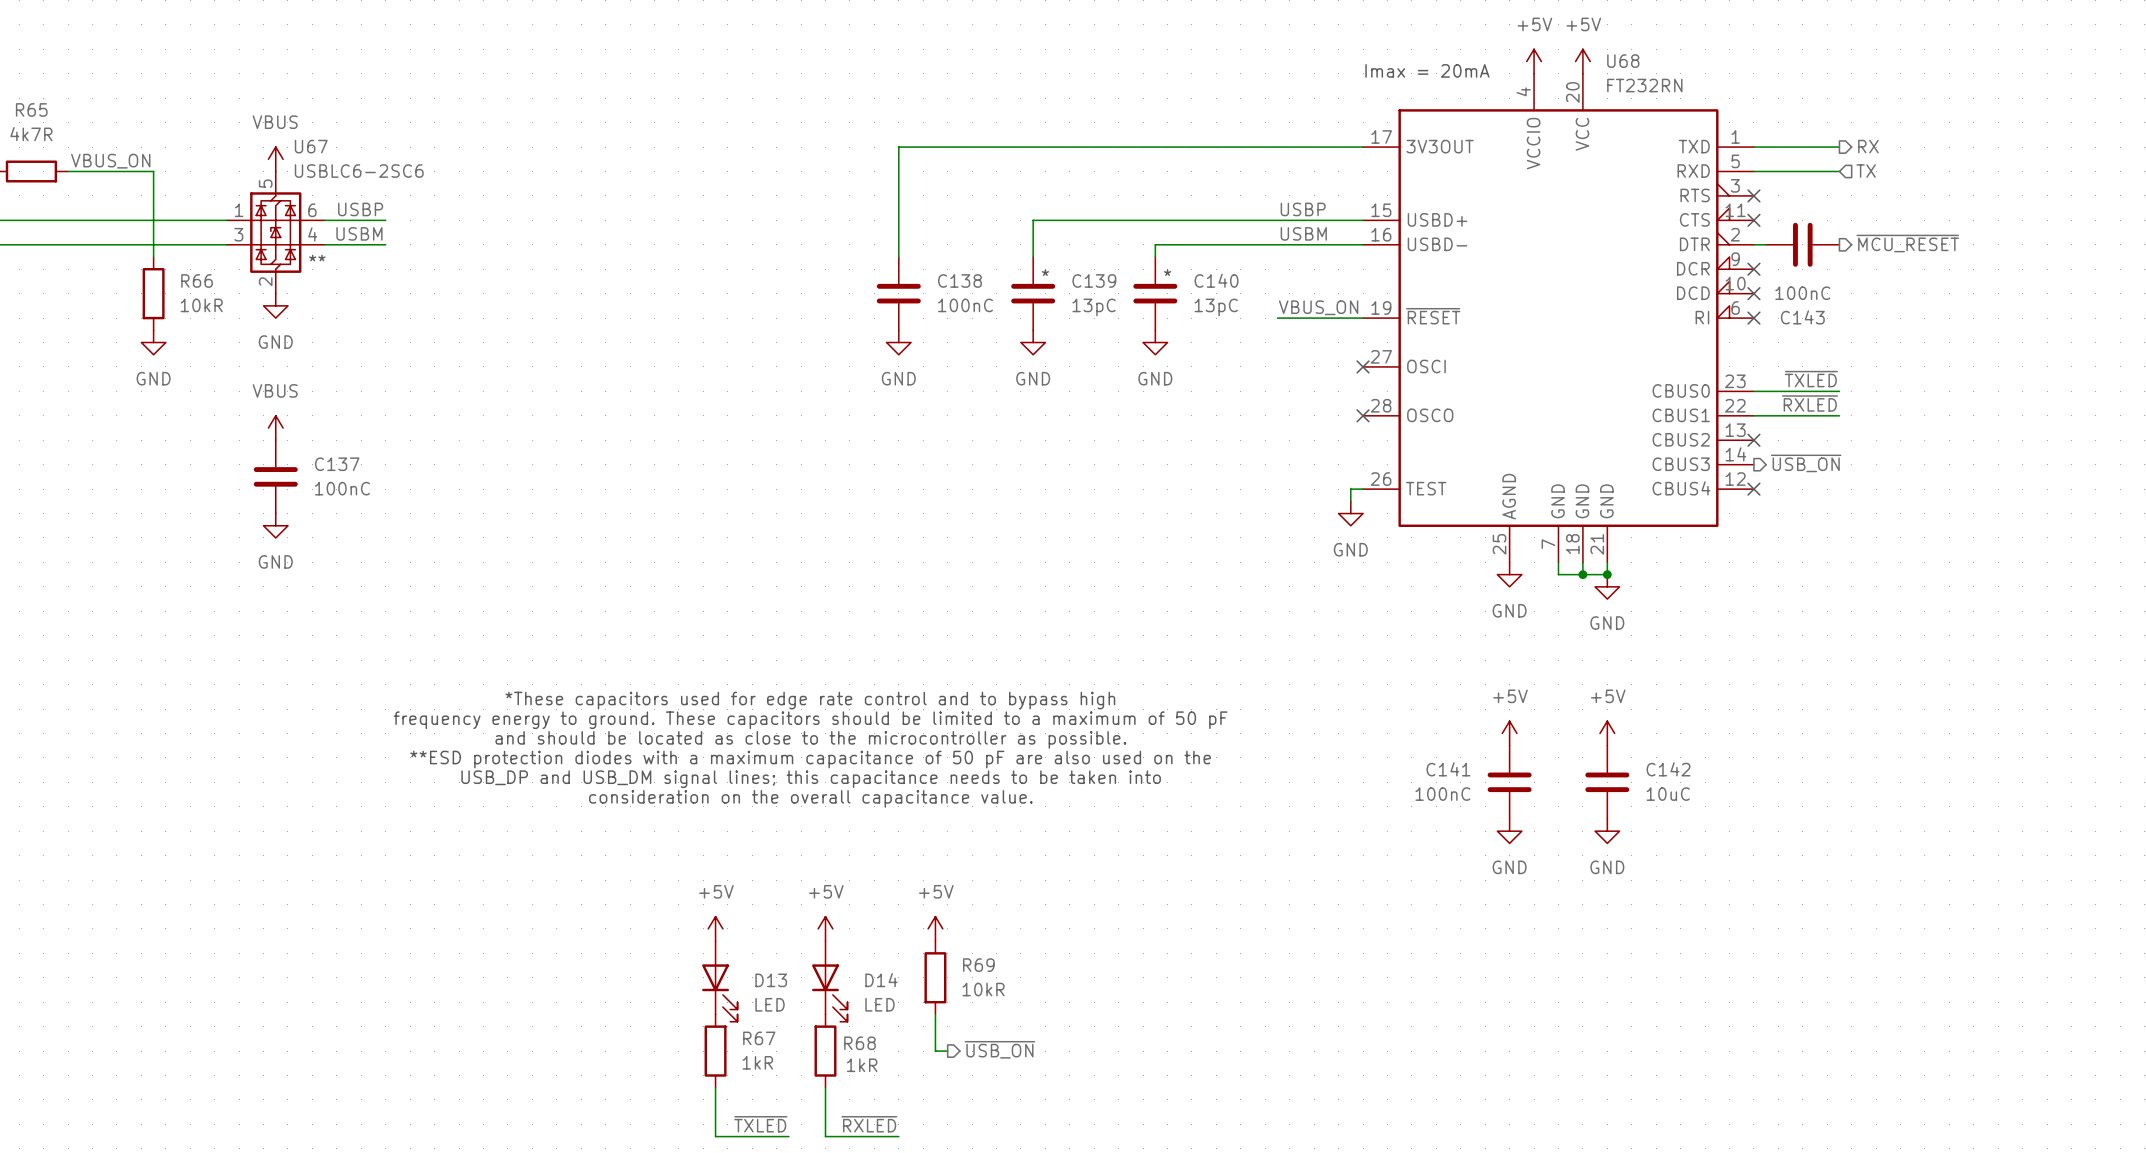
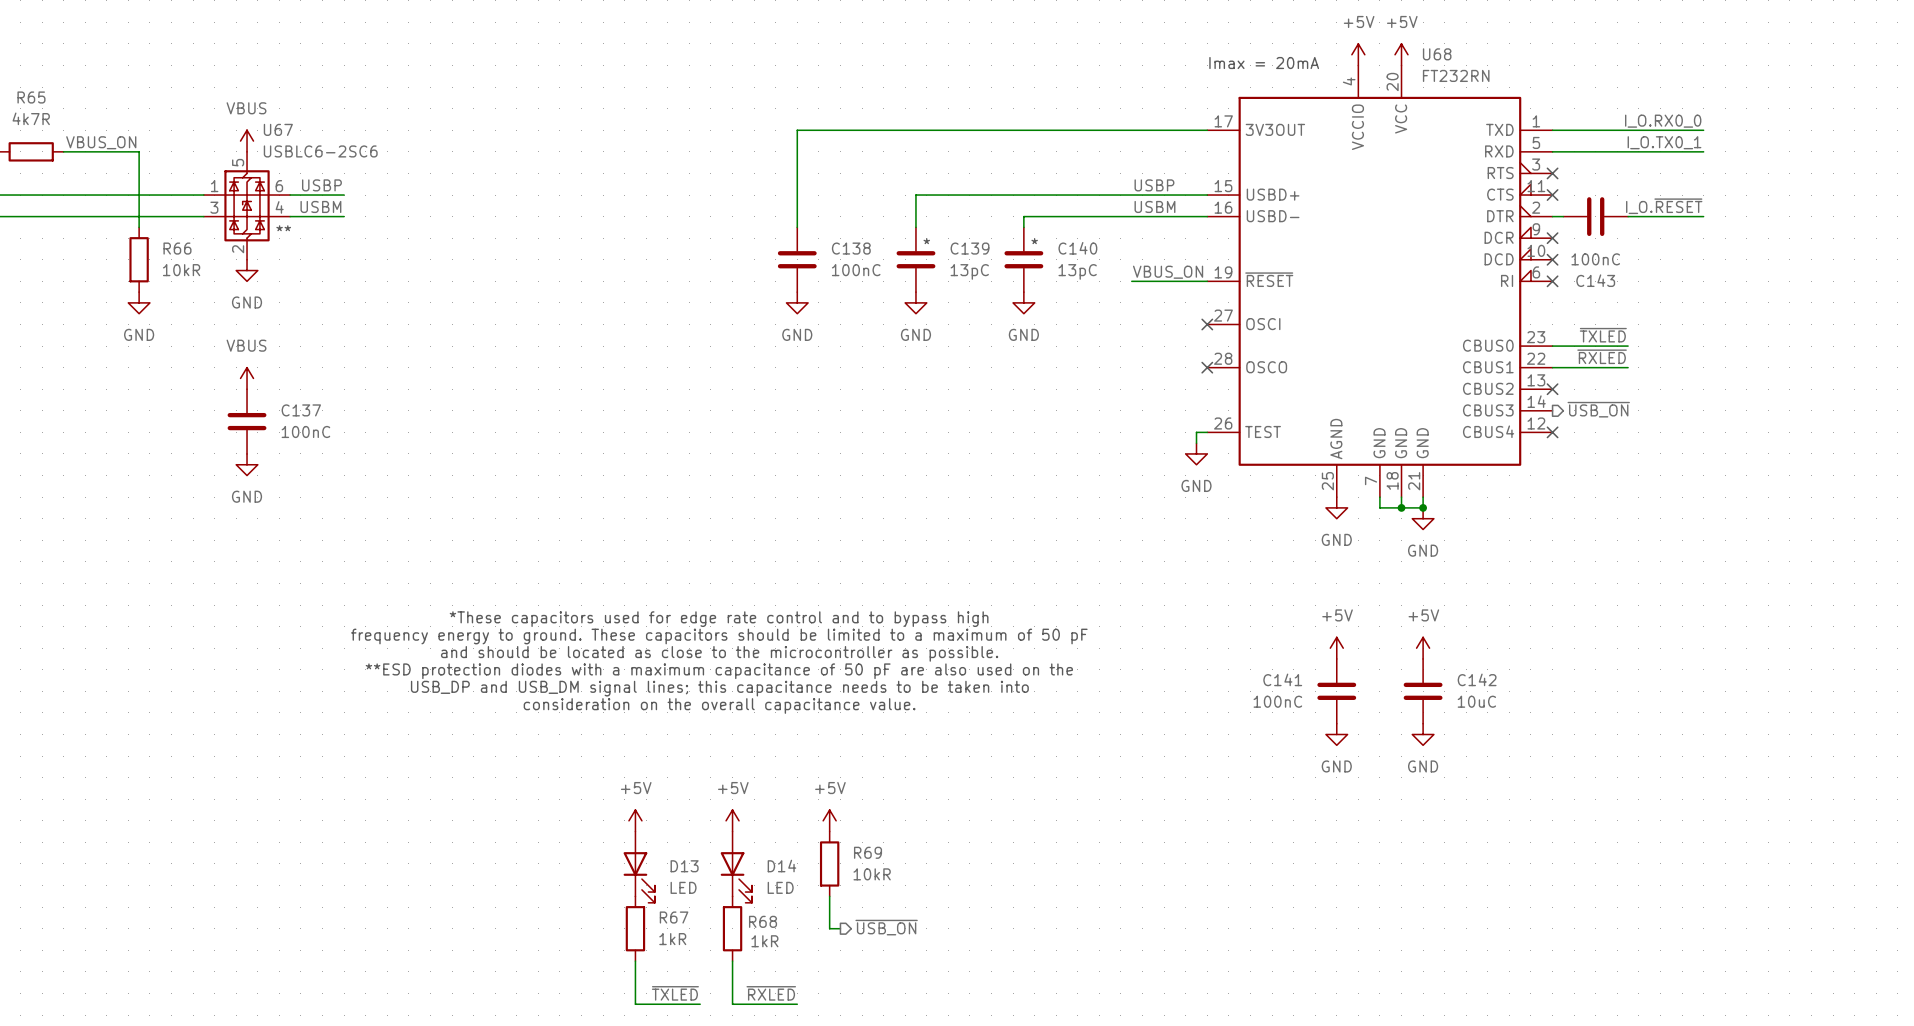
label: none -> I_O.RX0_0 (1663, 121)
hierarchical label: RX (1868, 146) -> none
wire: none -> (1628, 130) (1703, 130)
label: none -> I_O.TX0_1 (1664, 142)
wire: none -> (1628, 151) (1703, 151)
hierarchical label: TX (1866, 171) -> none
label: none -> I_O.~{RESET} (1664, 206)
hierarchical label: ~{MCU_RESET} (1907, 243) -> none
wire: none -> (1628, 216) (1703, 216)

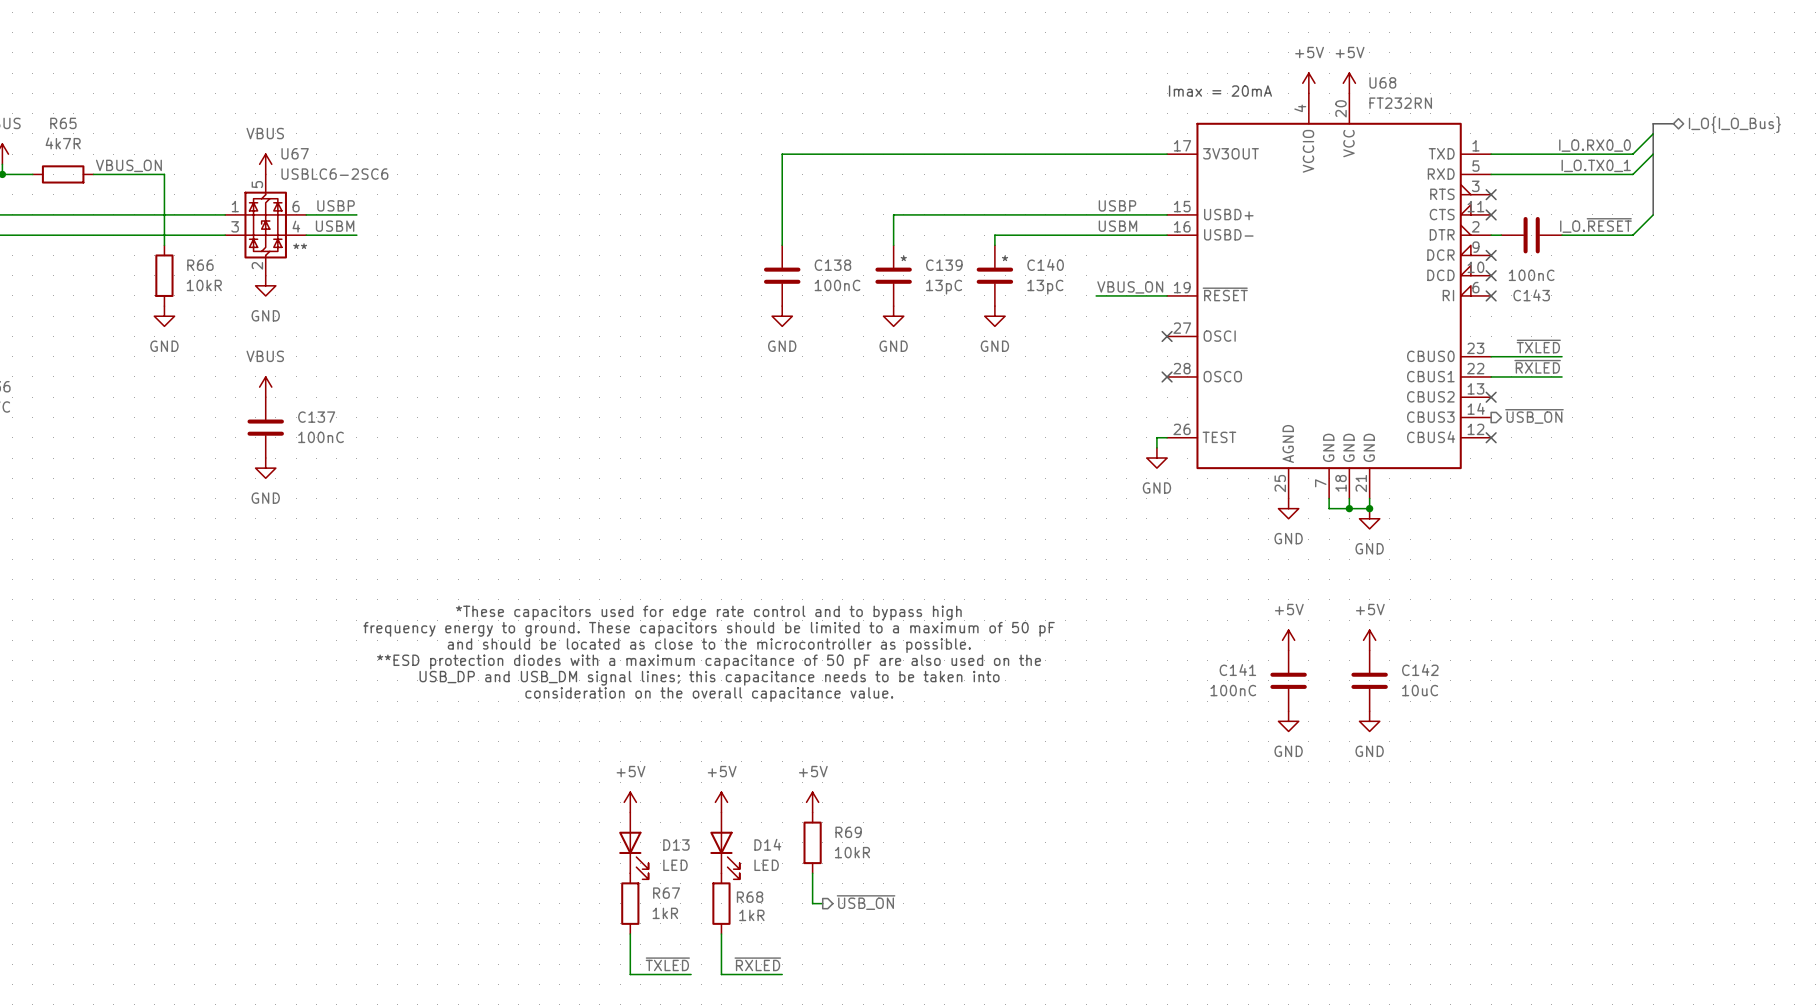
bus: none -> (1673, 123) (1653, 123) (1653, 214)
hierarchical label: none -> I_O{I_O_Bus} (1734, 124)
wire: none -> (1653, 133) (1632, 154)
wire: none -> (1653, 154) (1632, 174)
wire: none -> (1653, 214) (1632, 235)

